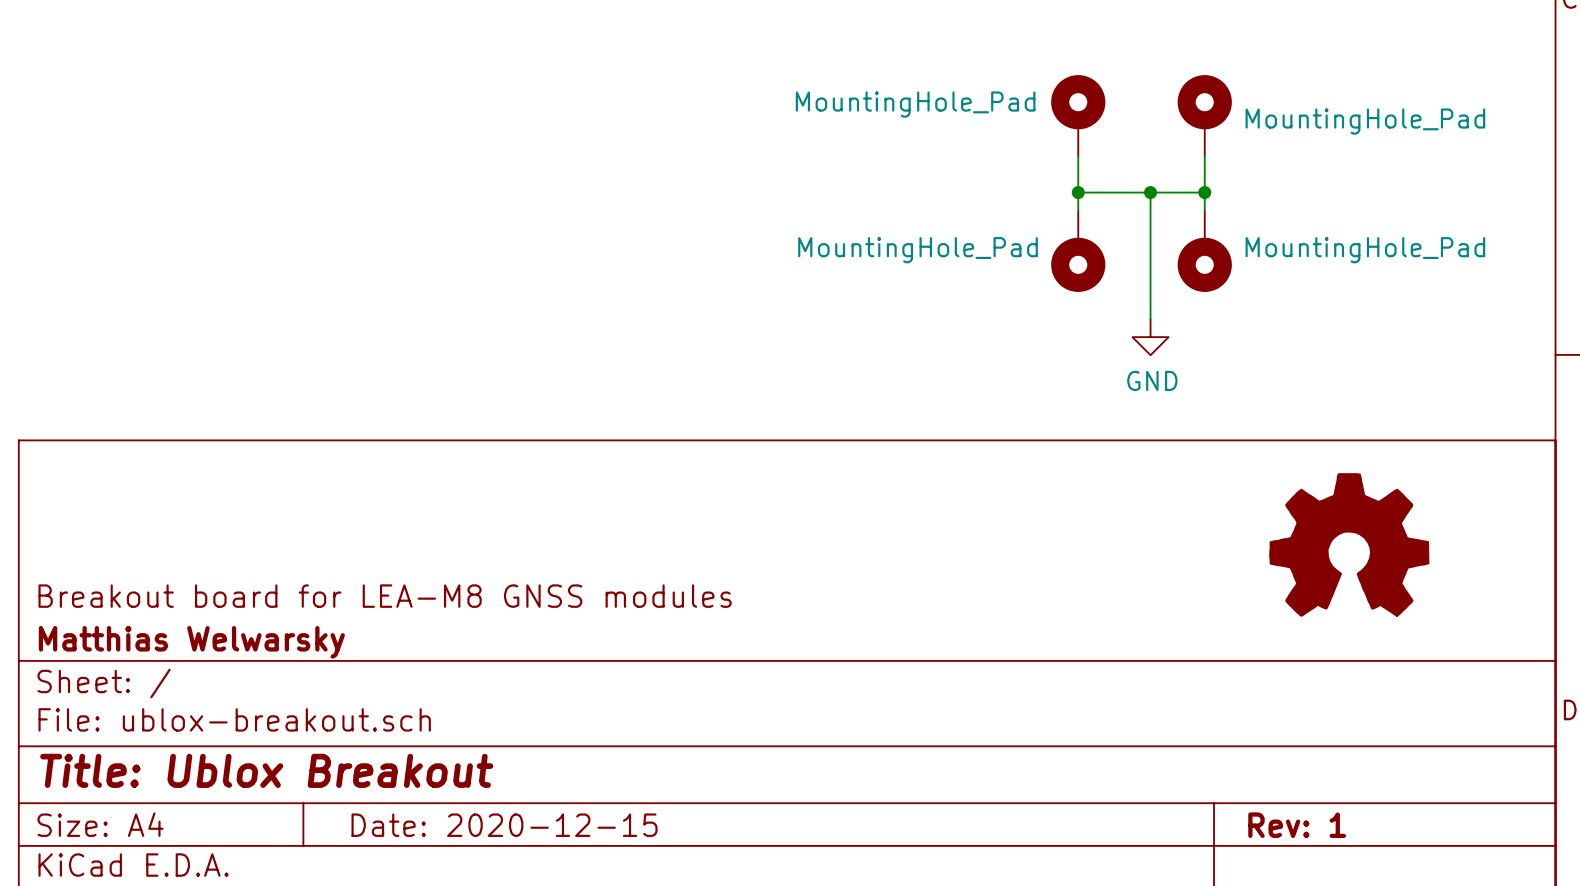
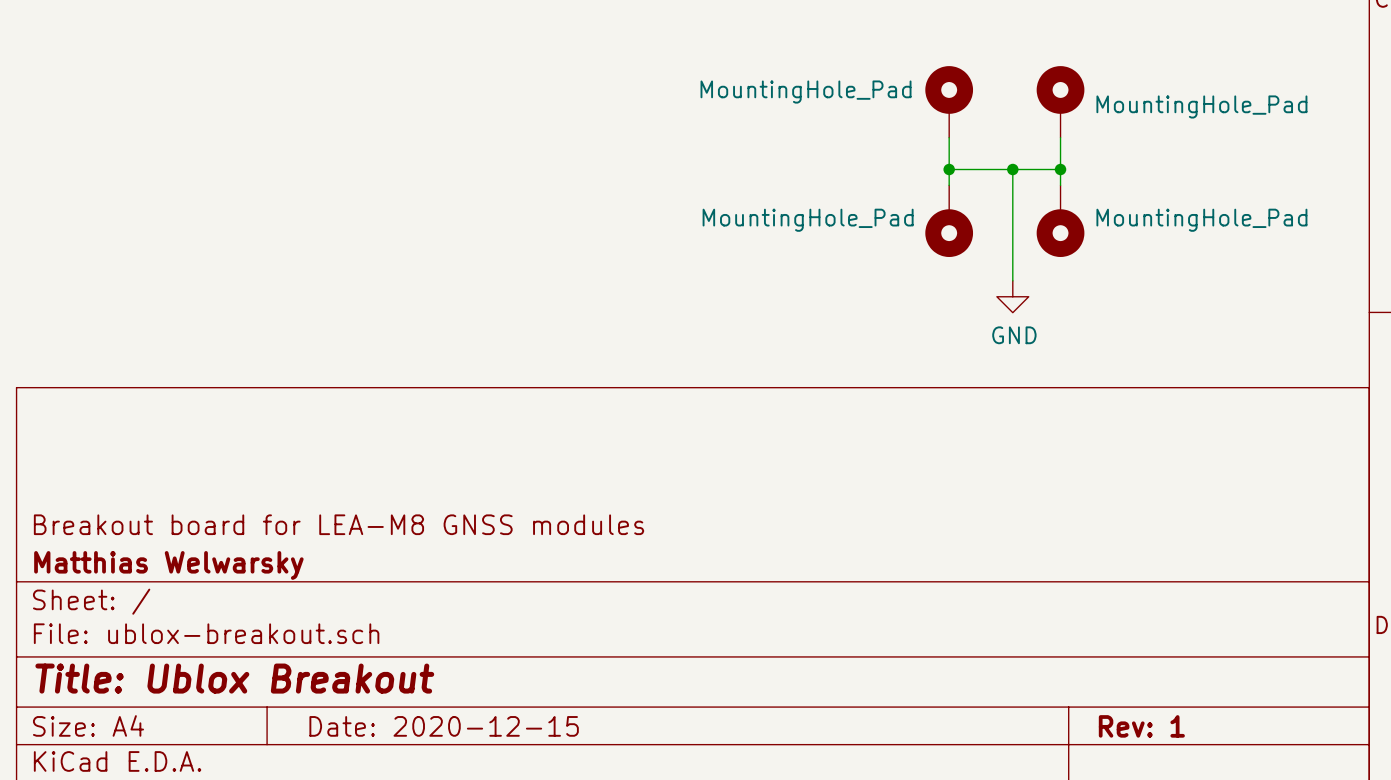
part: (1349, 544) -> none

